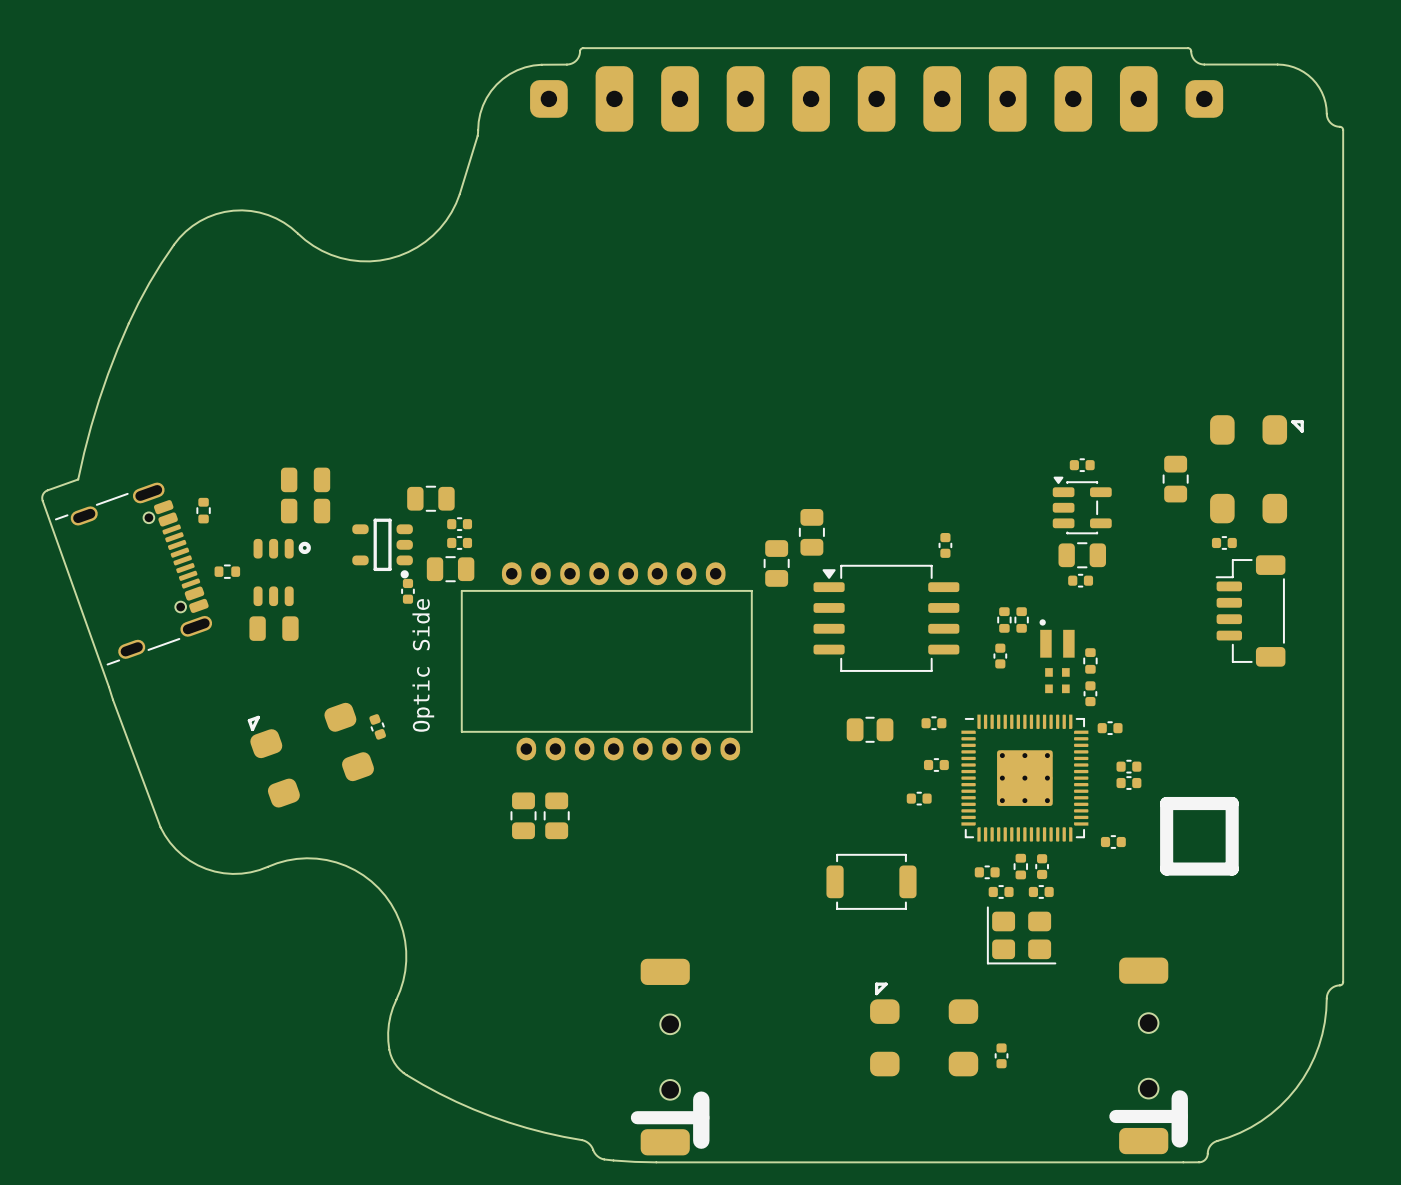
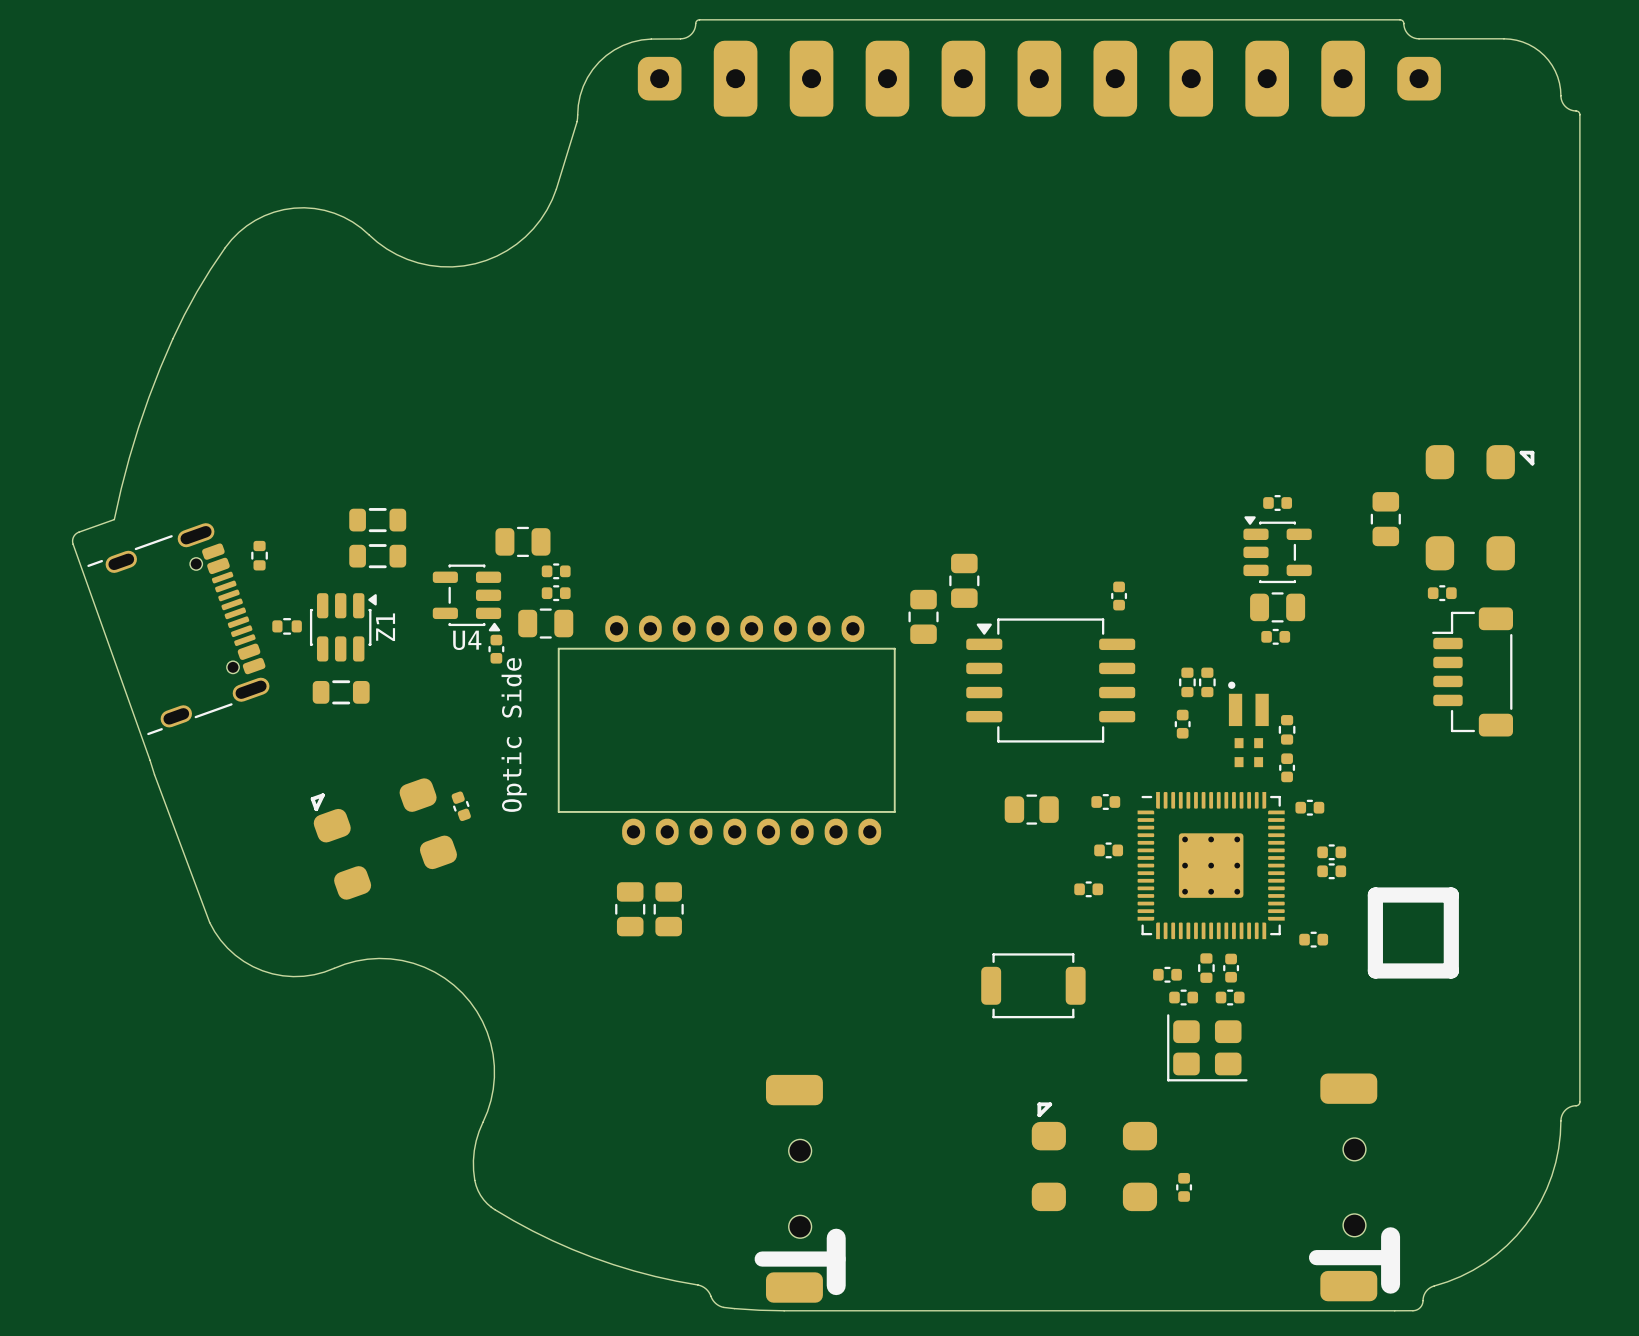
part footprint: [280, 467, 331, 493] -> [349, 508, 407, 533]
part footprint: [280, 498, 331, 524] -> [349, 544, 407, 569]
U4: none -> (466, 597)
part: (382, 548) -> none
Z1: none -> (343, 627)
part: (282, 572) -> none
part footprint: [249, 616, 299, 641] -> [312, 680, 370, 705]

